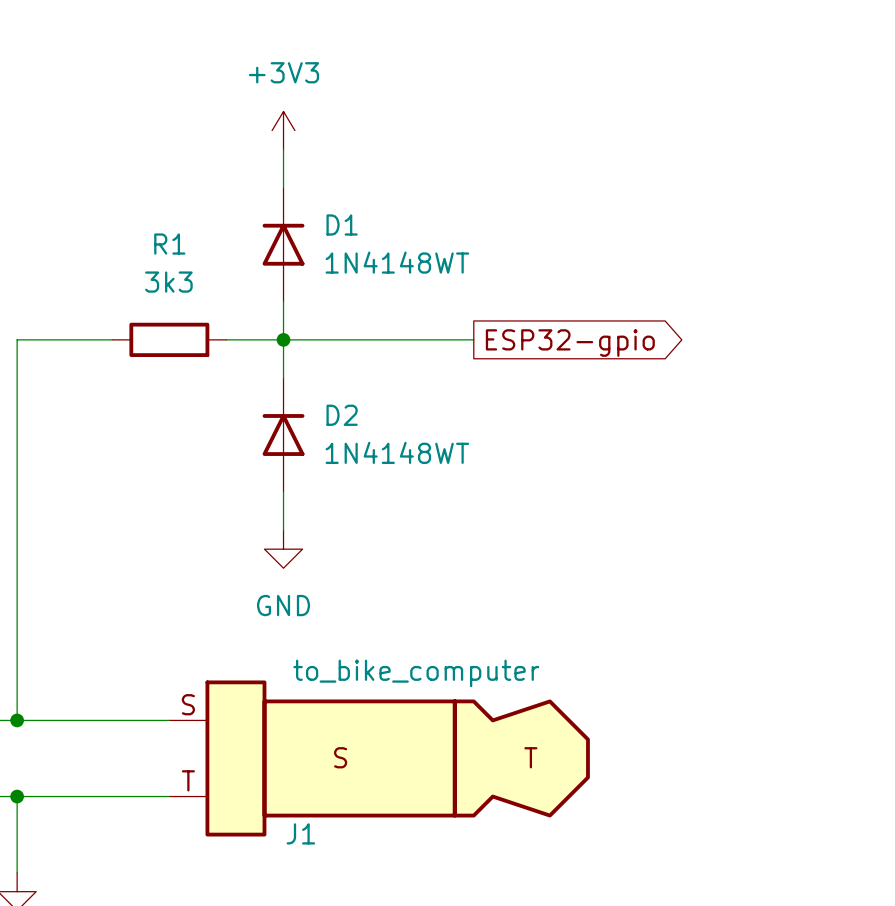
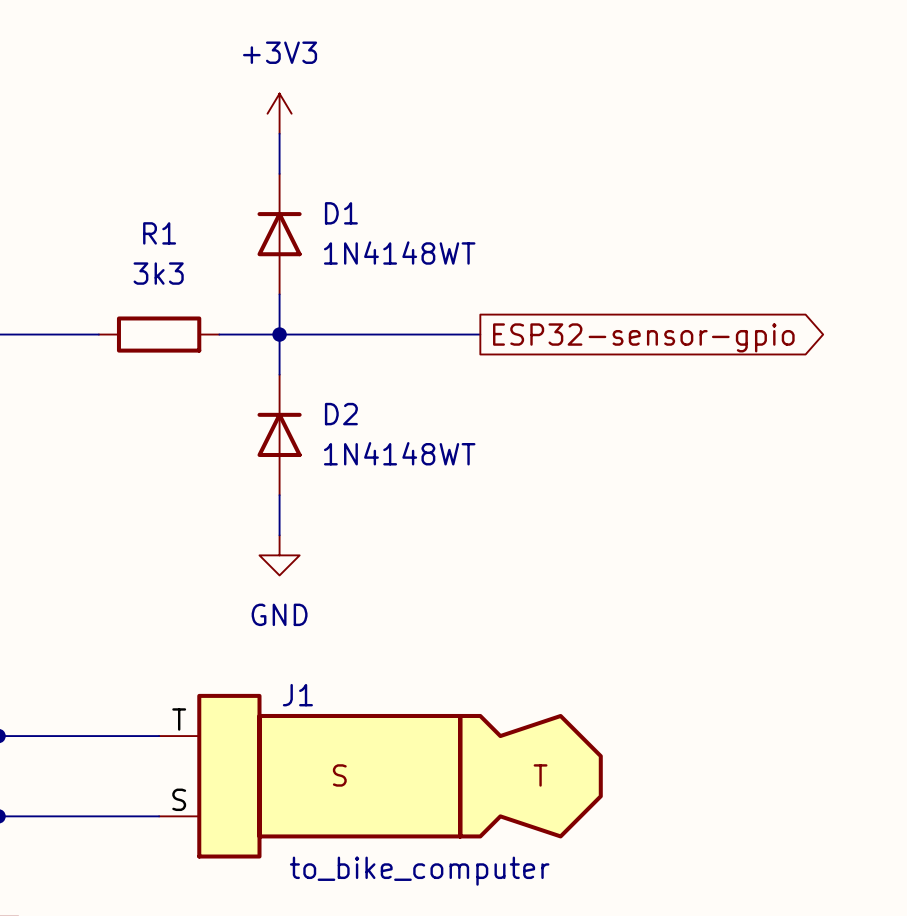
global label: ESP32-gpio (570, 343) -> ESP32-sensor-gpio (643, 337)
J1 flip: as is (397, 758) -> up-down (400, 776)

